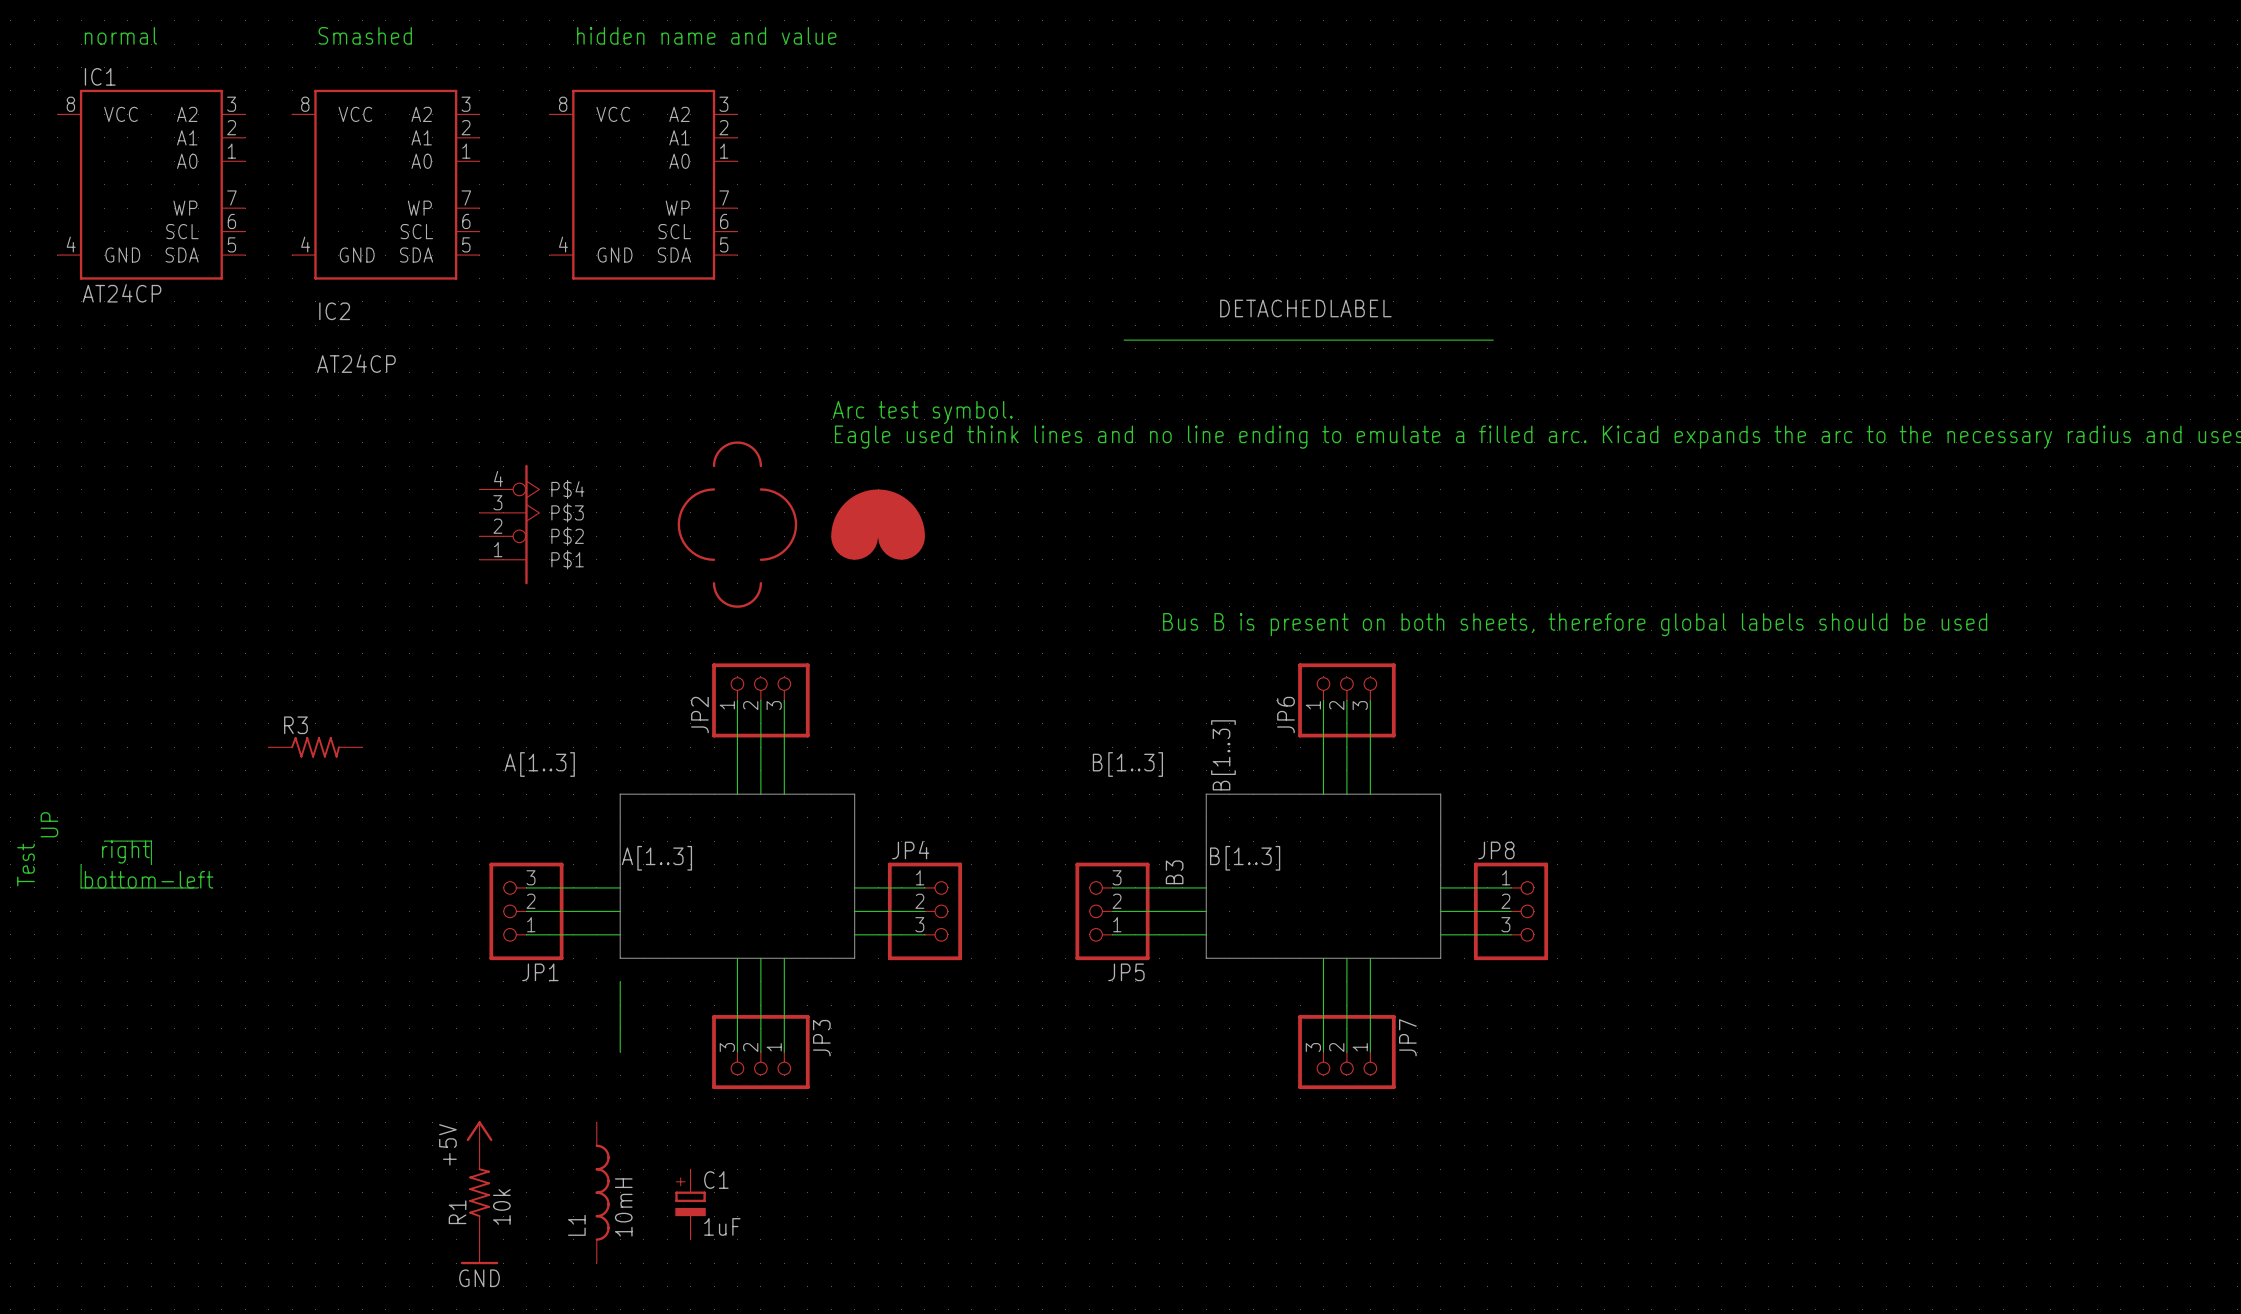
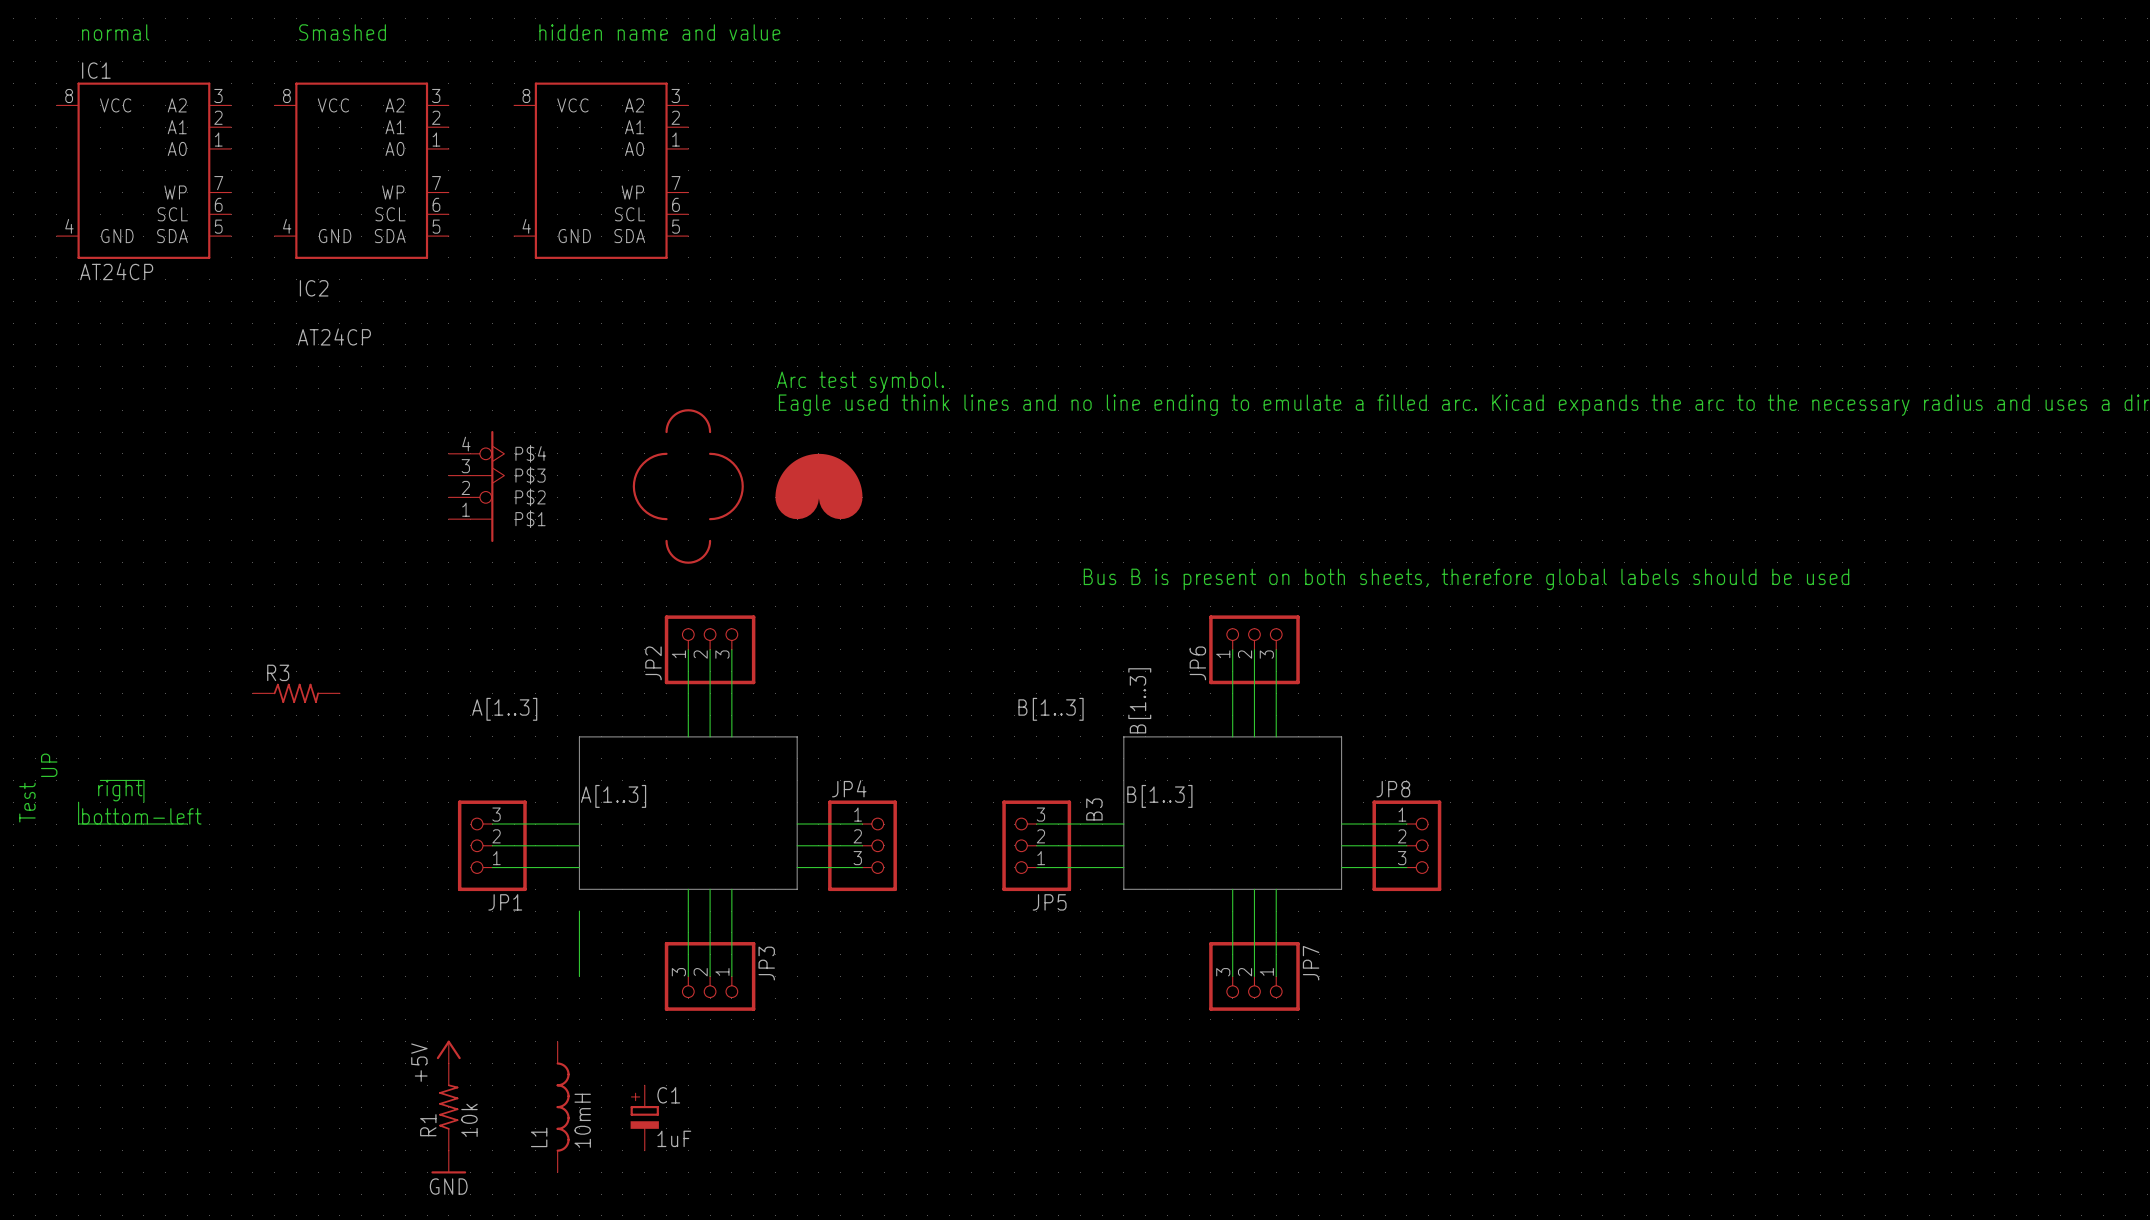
label: DETACHEDLABEL (1305, 308) -> none
wire: (1124, 340) (1493, 340) -> none

